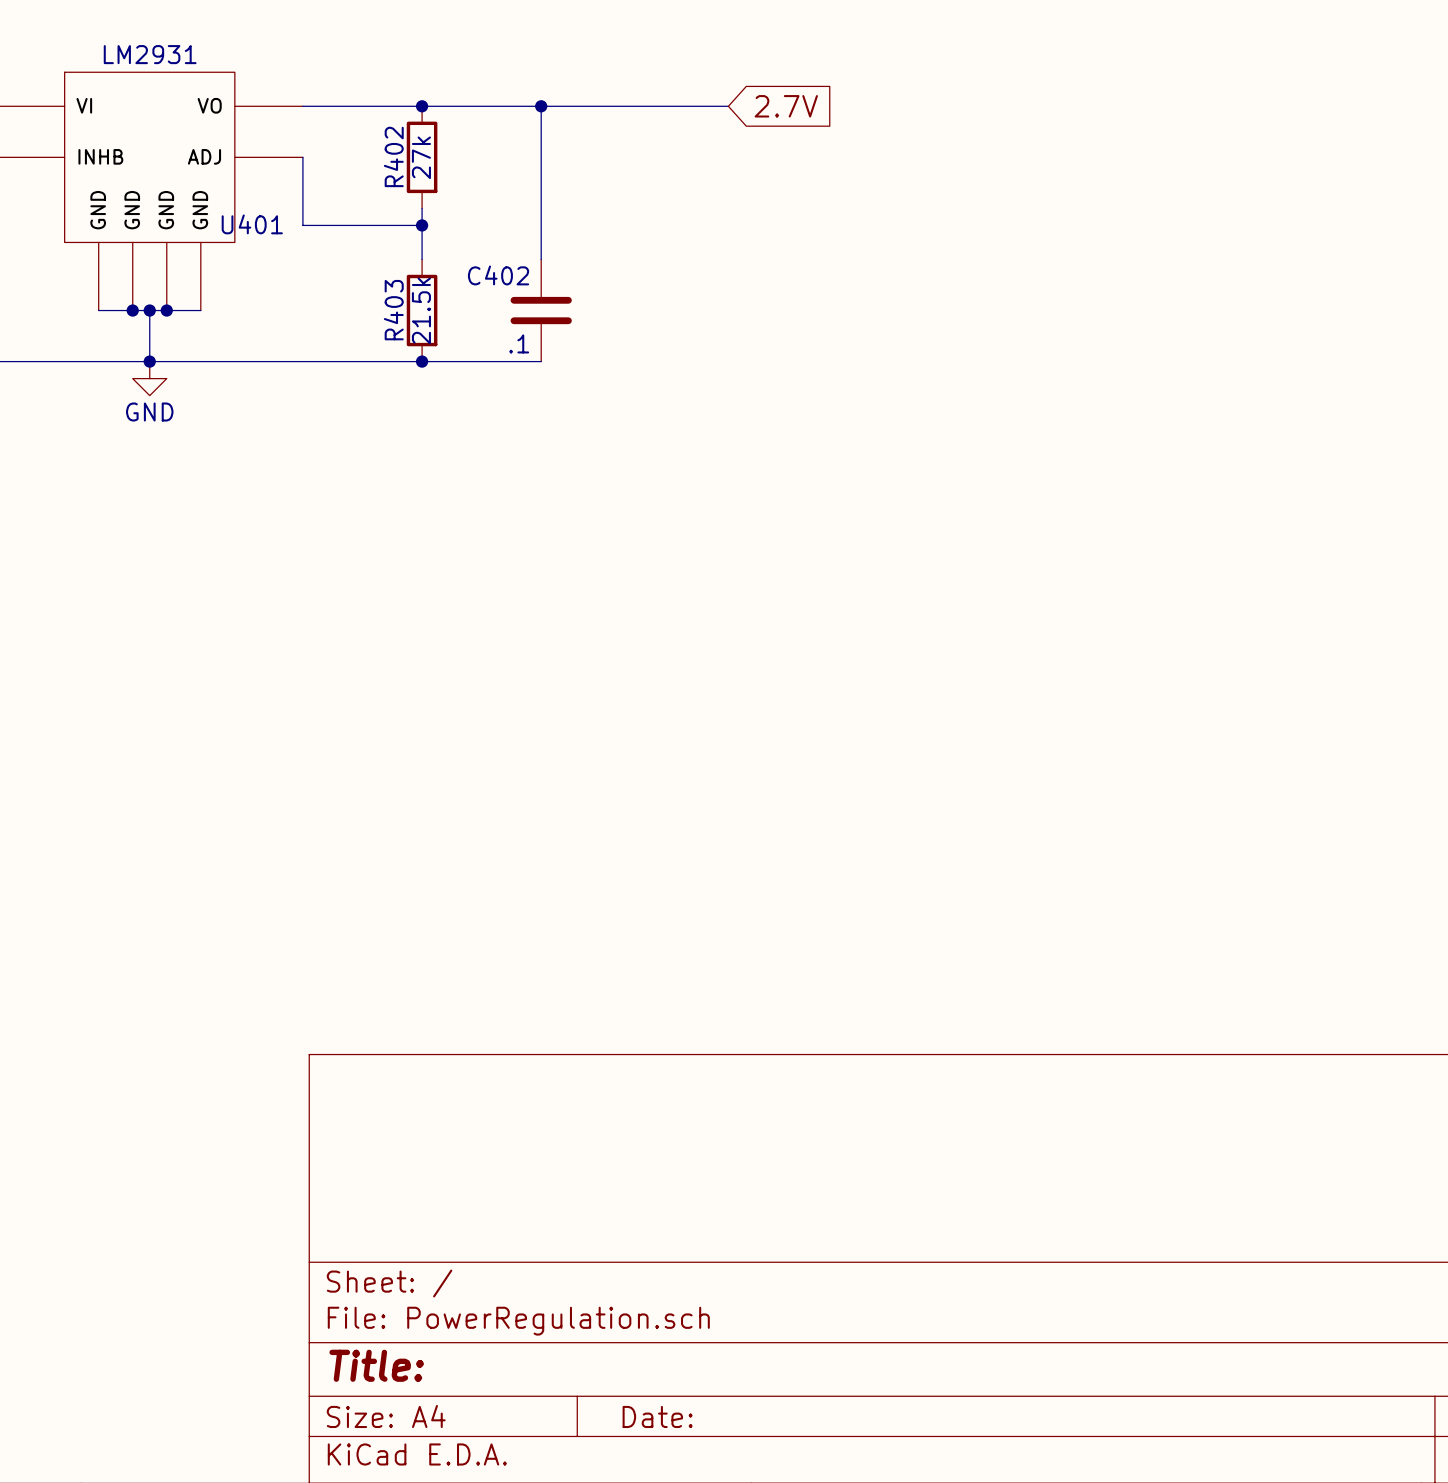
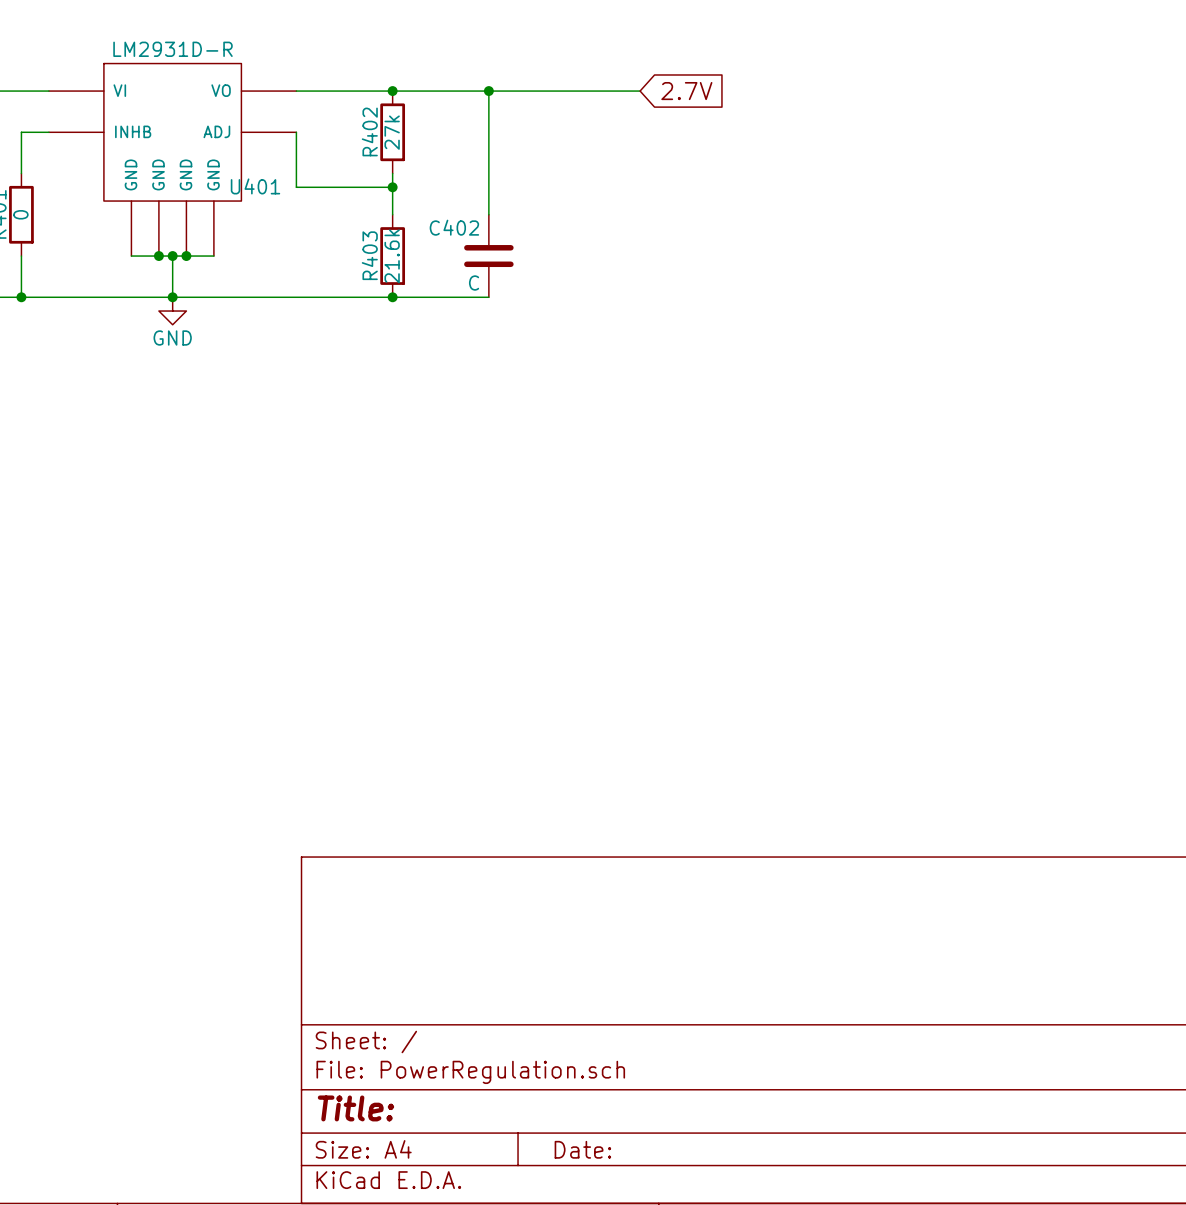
U401 value: LM2931 (150, 54) -> LM2931D-R (172, 49)
R403 value: 21.5k (421, 310) -> 21.6k (392, 256)
C402 value: .1 (519, 343) -> C (474, 283)

